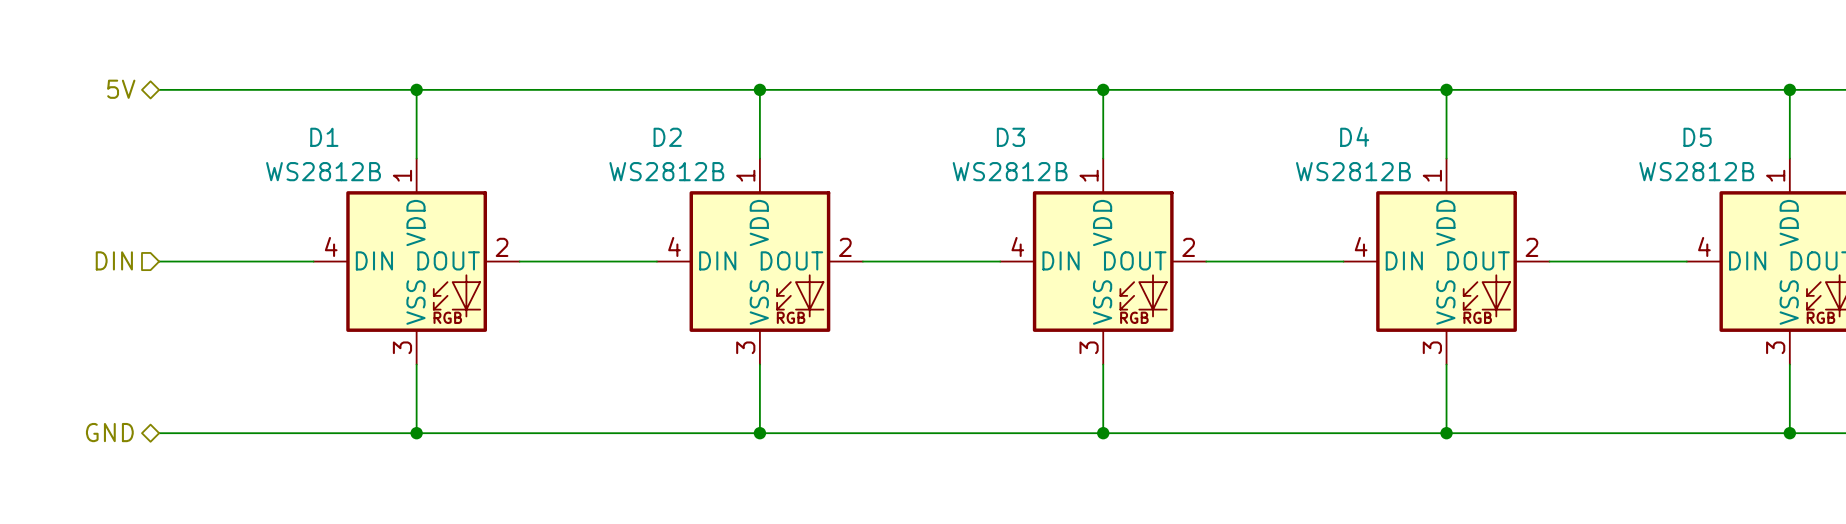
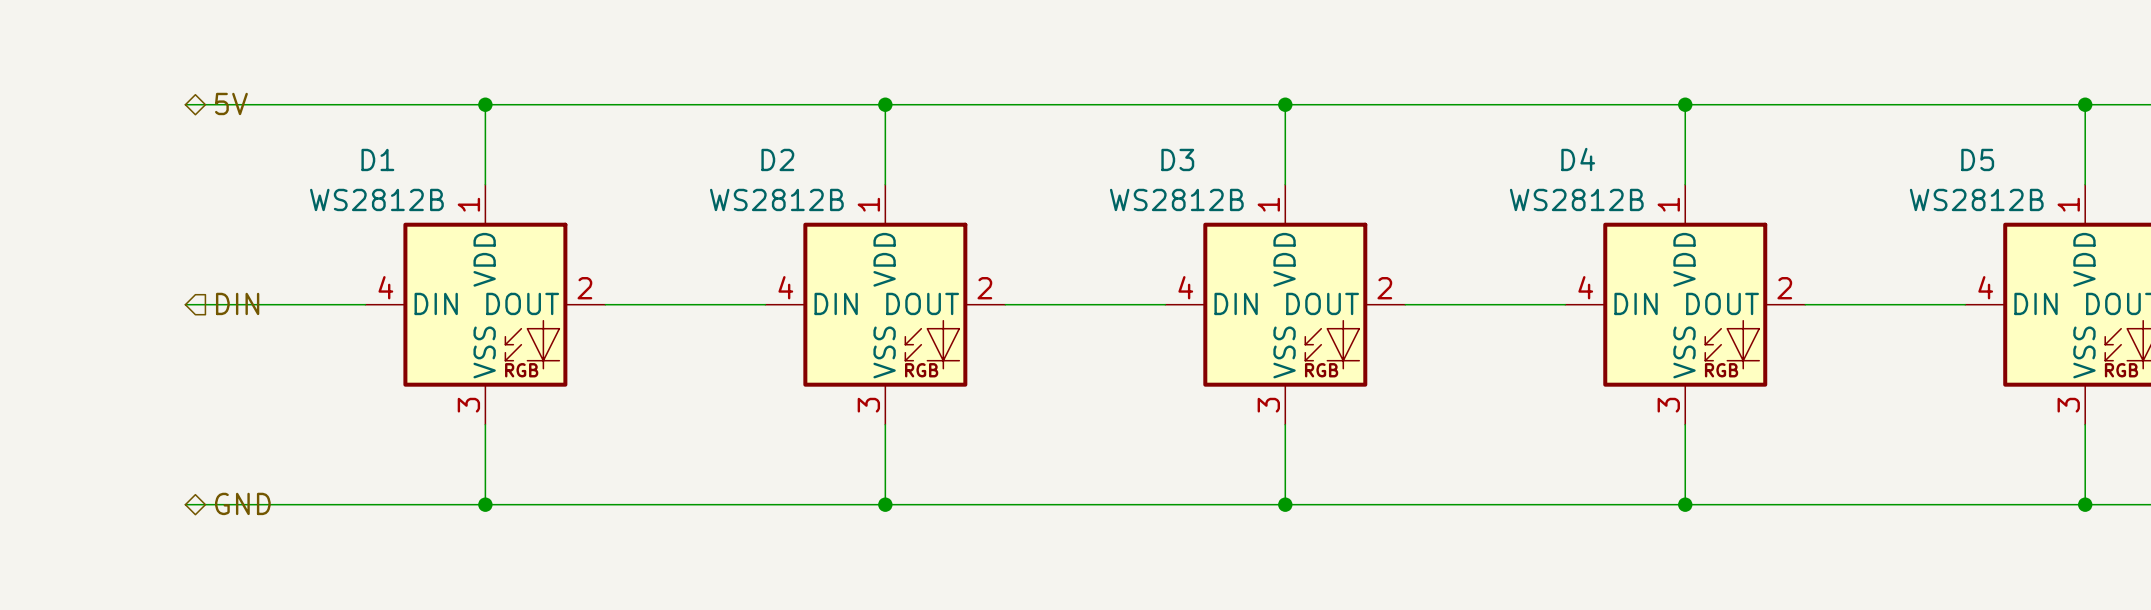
hierarchical label rotation: 0° (121, 89) -> 180° (231, 103)
hierarchical label position: 5V (121, 89) -> 5V (231, 103)
hierarchical label rotation: 0° (114, 260) -> 180° (237, 303)
hierarchical label position: DIN (114, 260) -> DIN (237, 303)
hierarchical label rotation: 0° (109, 432) -> 180° (242, 503)
hierarchical label position: GND (109, 432) -> GND (242, 503)

